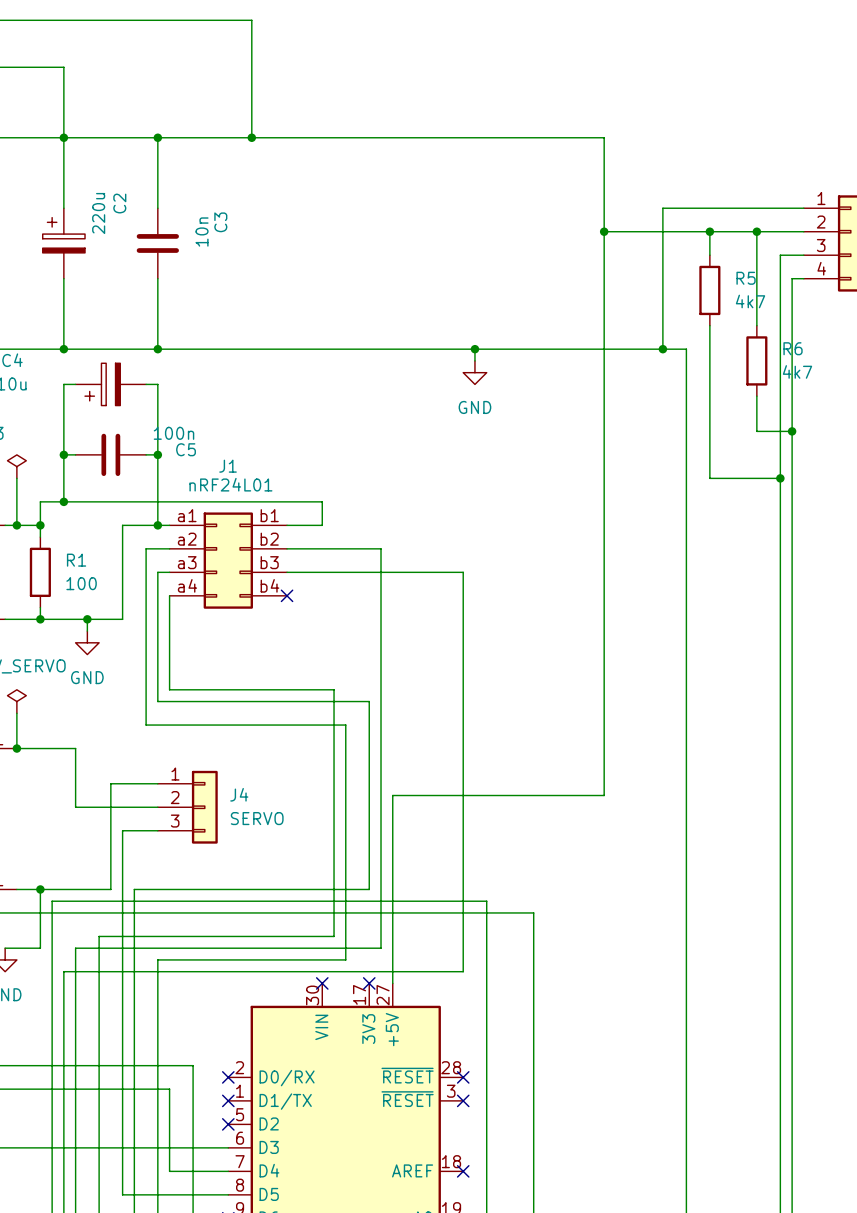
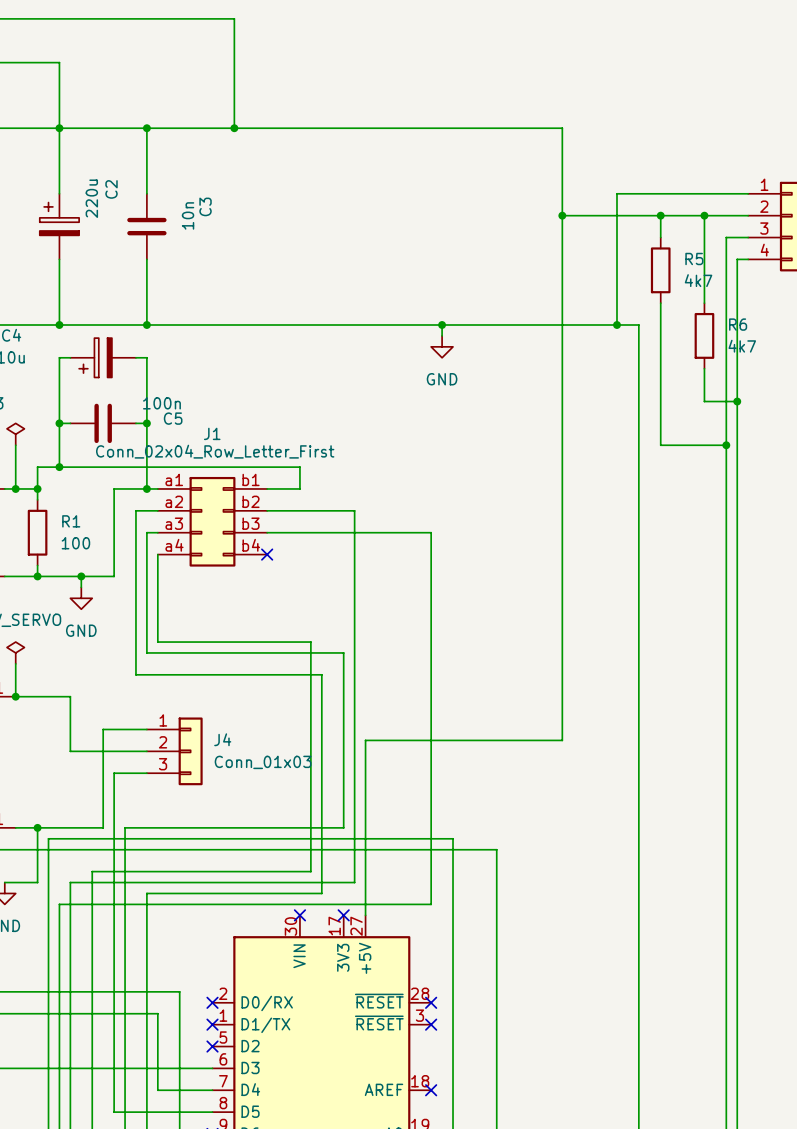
J1 value: nRF24L01 (230, 484) -> Conn_02x04_Row_Letter_First (215, 451)
J4 value: SERVO (257, 818) -> Conn_01x03 (263, 762)

